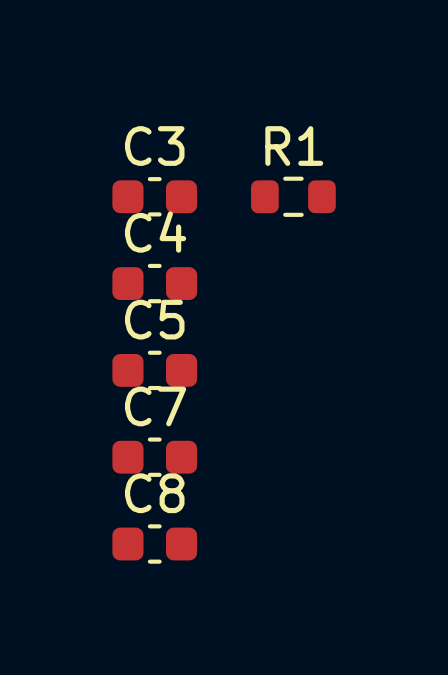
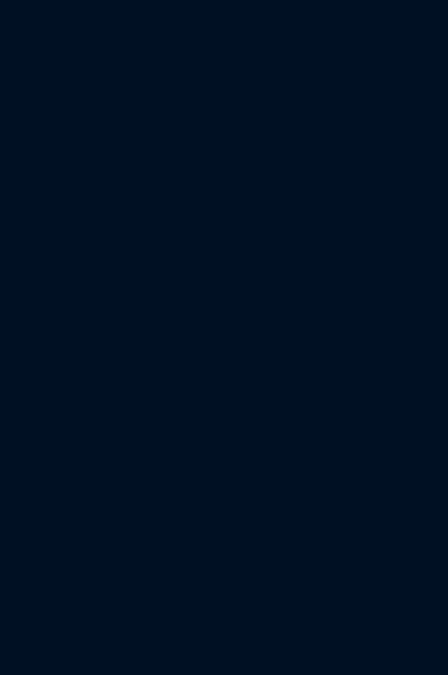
C3: (154, 196) -> none
R1: (293, 196) -> none
C4: (154, 283) -> none
C5: (154, 370) -> none
C7: (154, 457) -> none
C8: (154, 544) -> none

